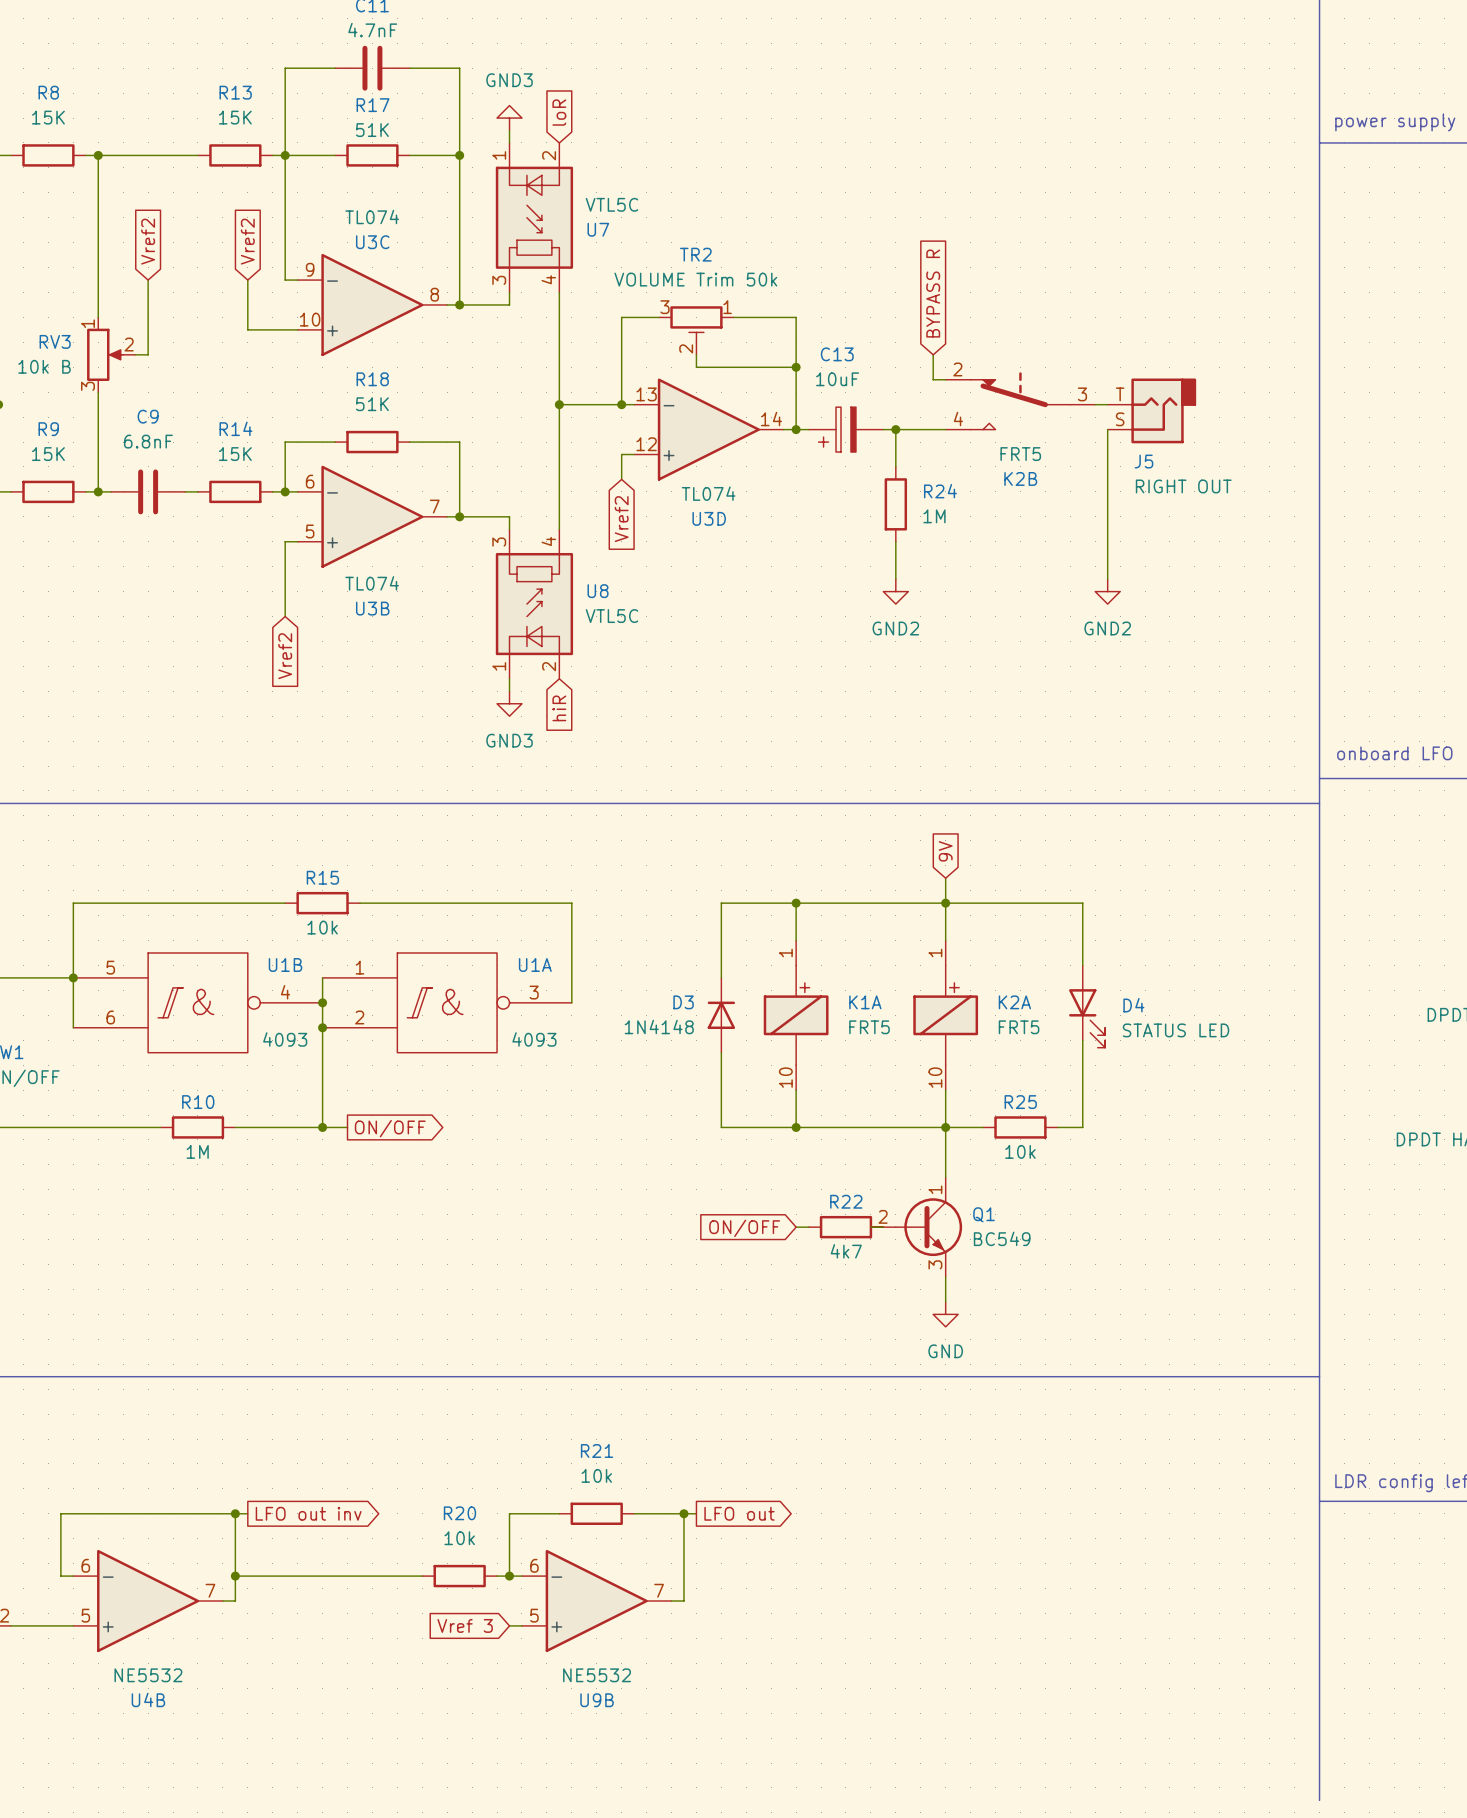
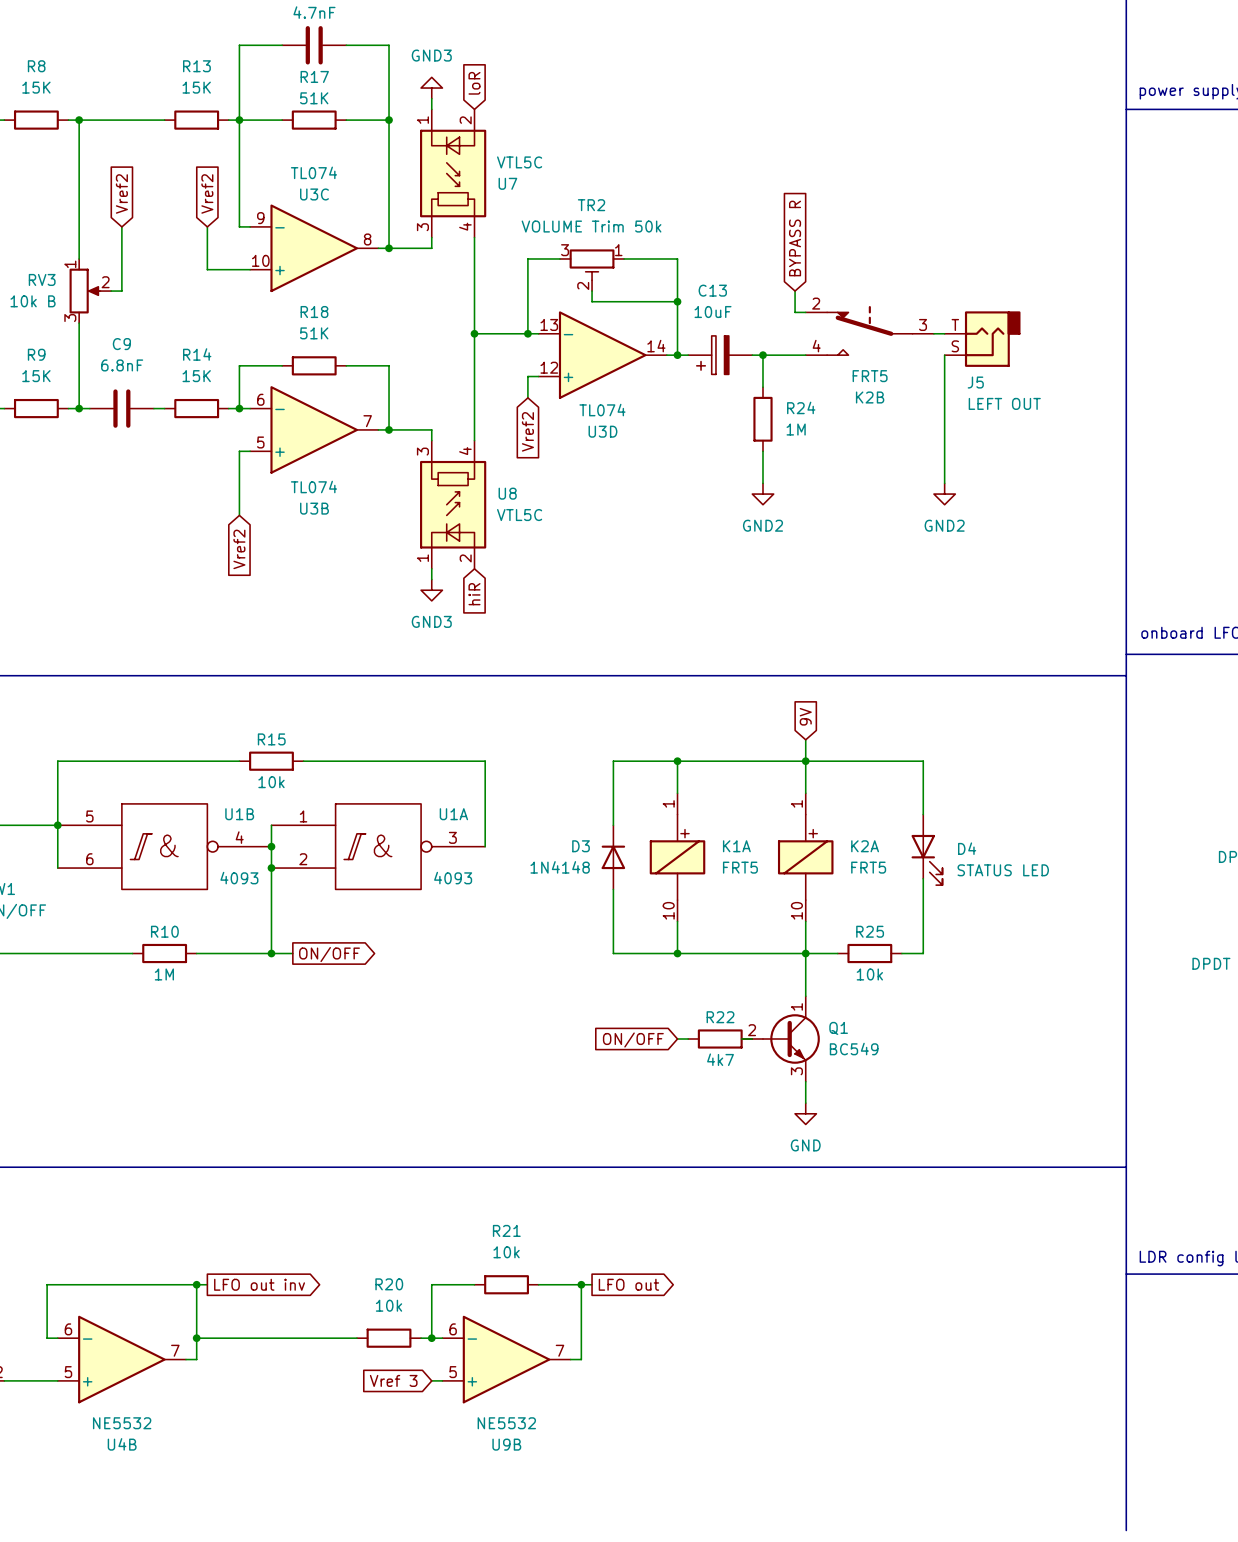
J5 value: RIGHT OUT (1183, 486) -> LEFT OUT (1004, 403)

